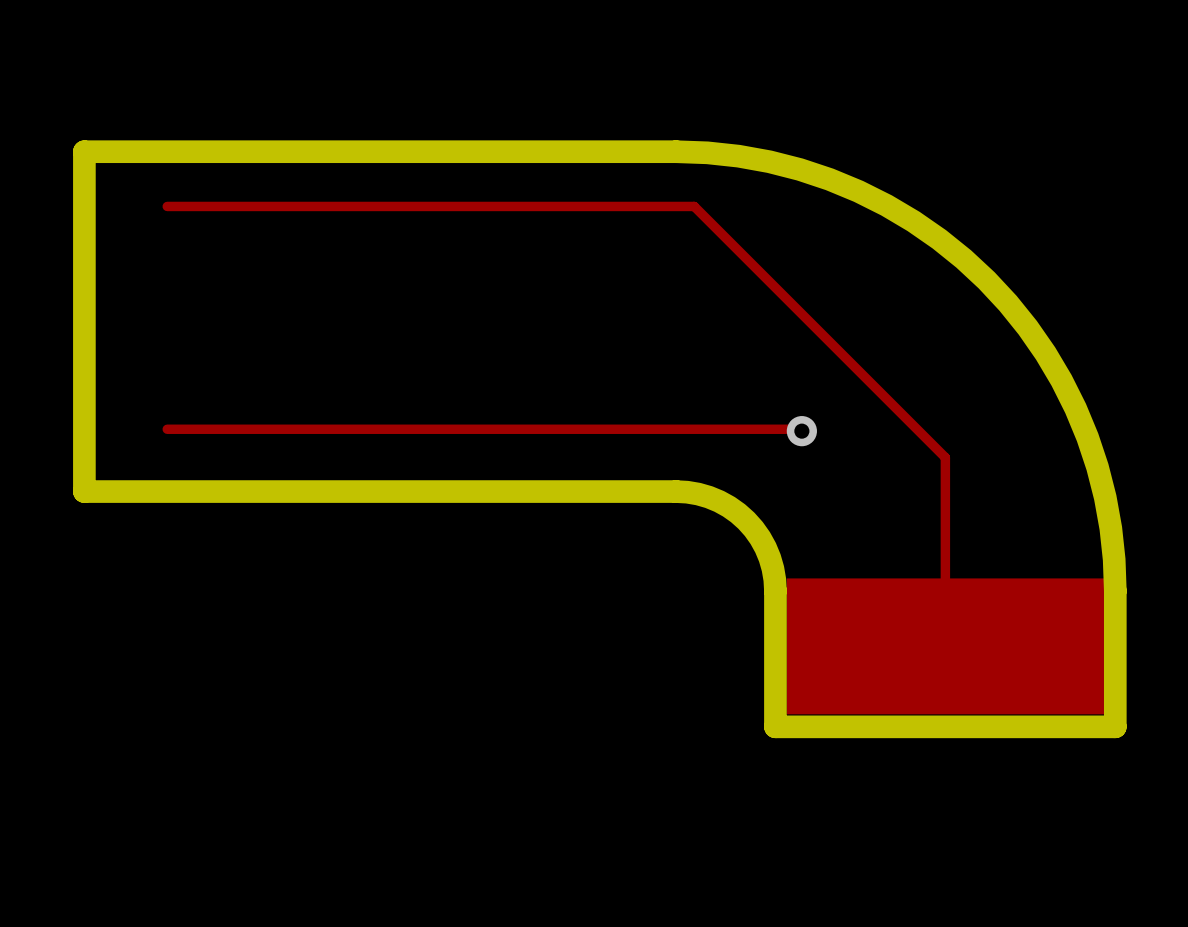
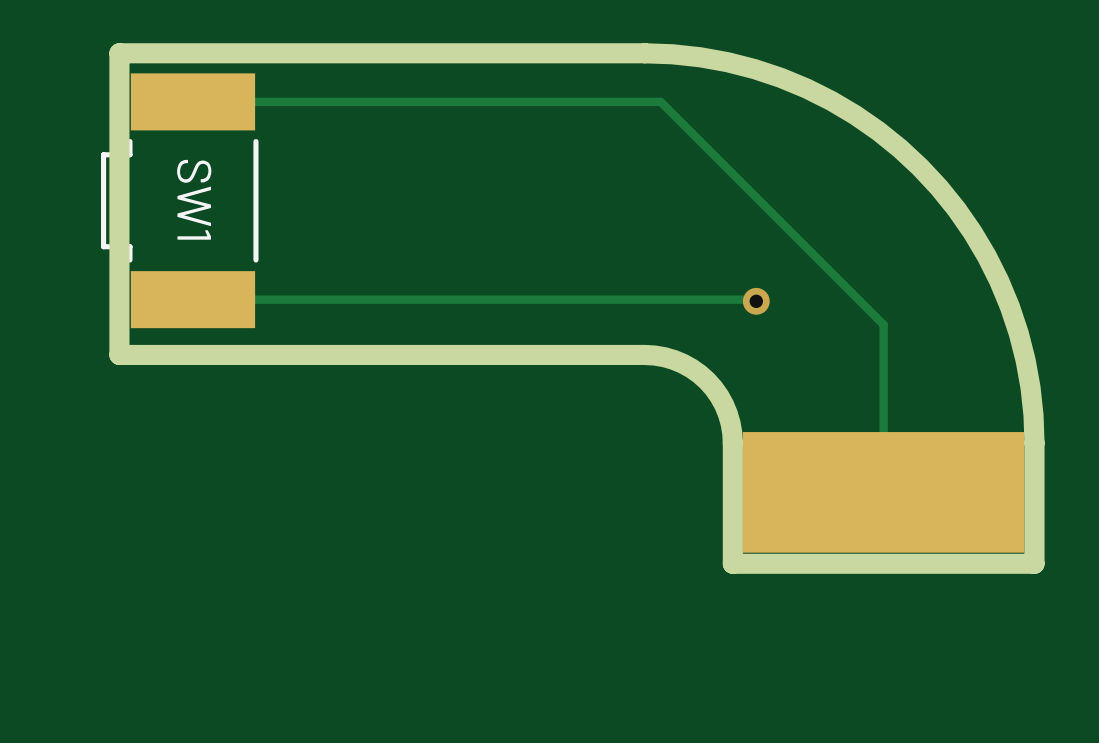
SW1: none -> (179, 200)

